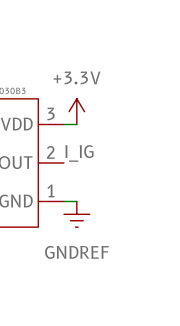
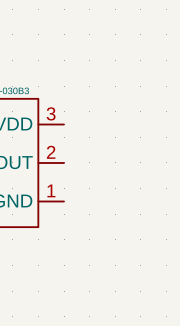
power symbol: +3.3V (76, 111) -> none
wire: (64, 124) (76, 124) -> none
label: I_IG (79, 153) -> none
wire: (64, 201) (76, 201) -> none
power symbol: GNDREF (76, 214) -> none

